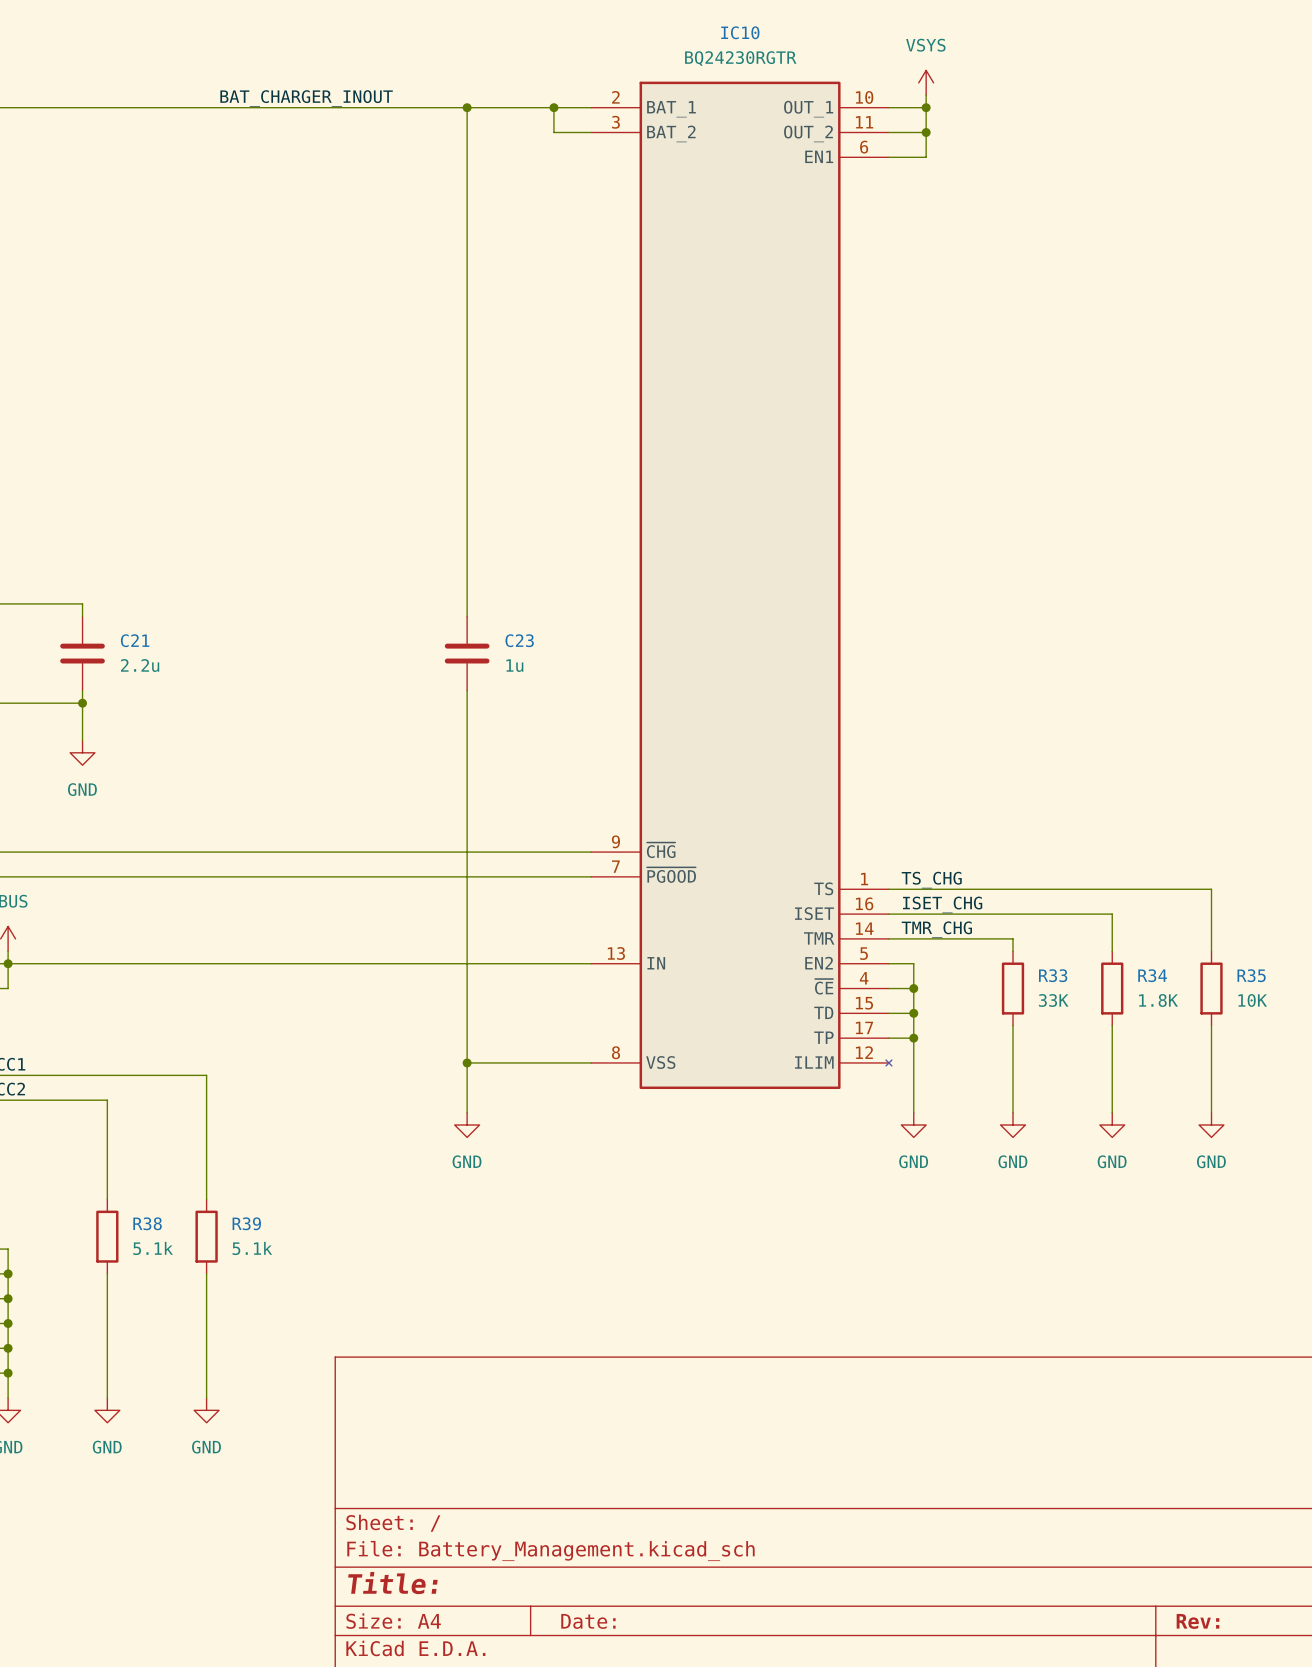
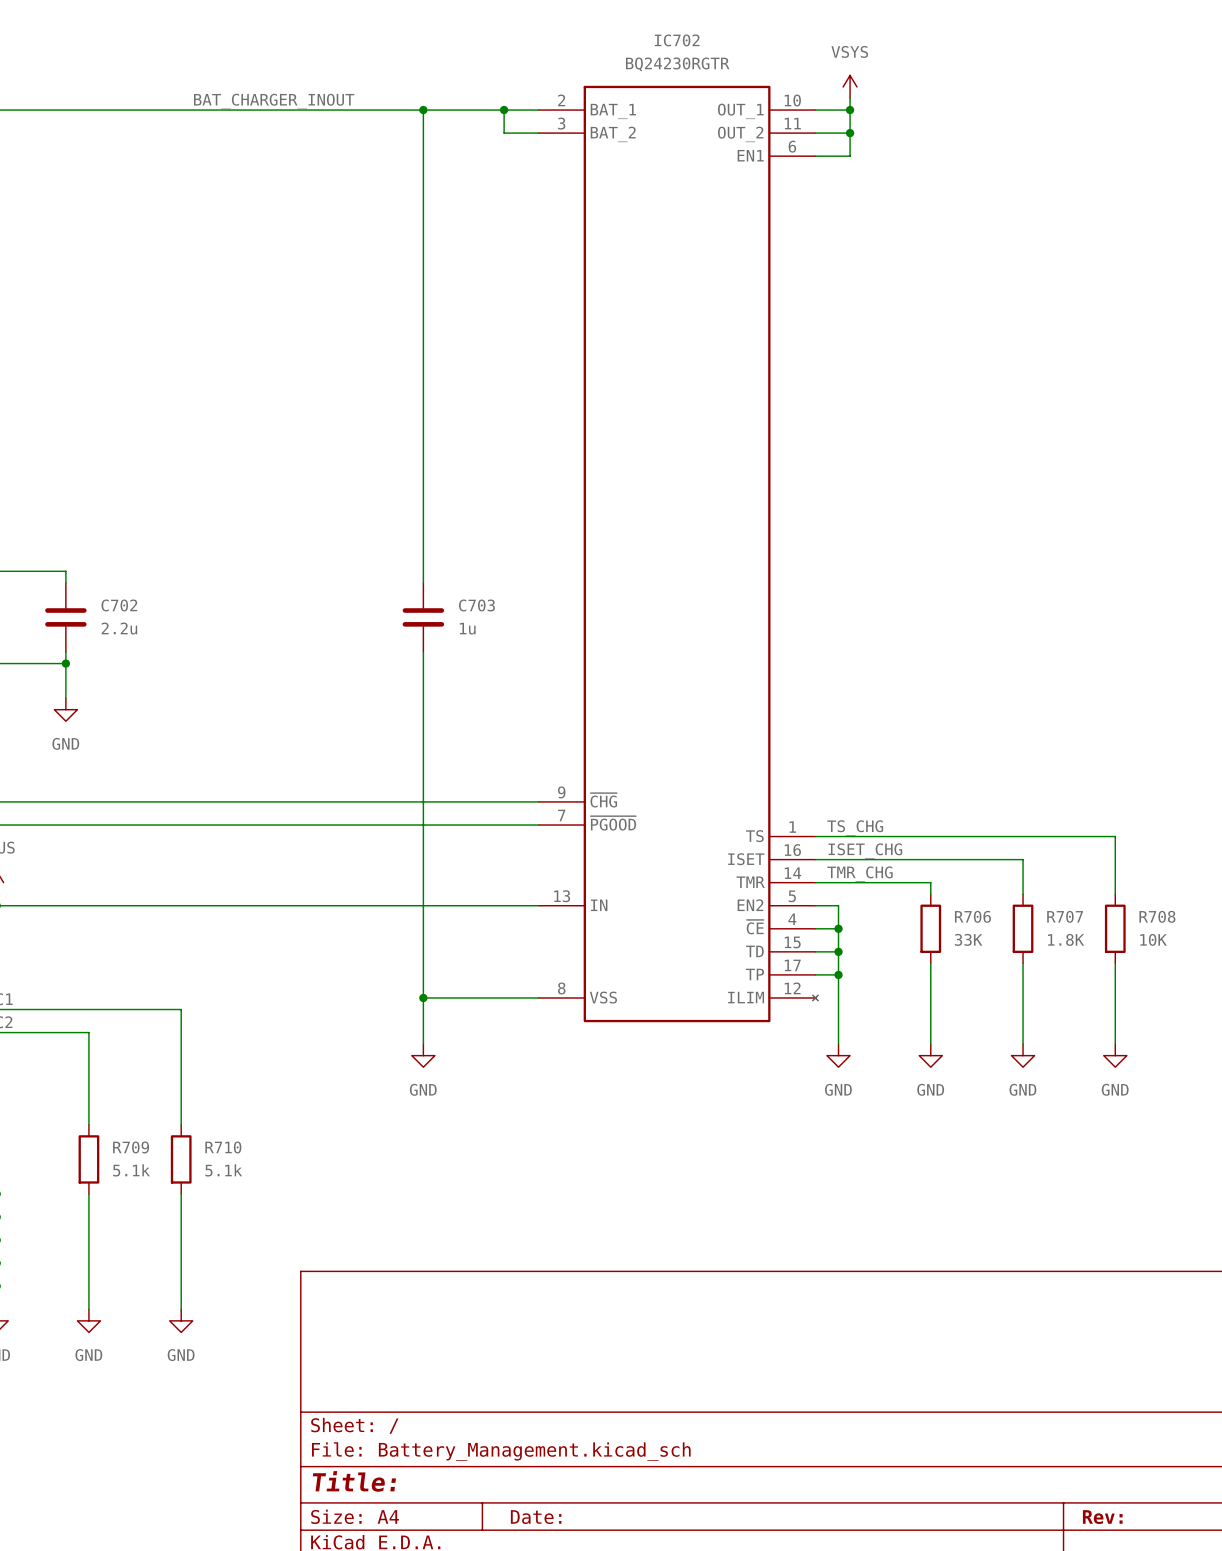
IC10 name: IC10 (740, 32) -> IC702 (677, 40)
C21 name: C21 (135, 640) -> C702 (119, 605)
C23 name: C23 (519, 640) -> C703 (476, 605)
R33 name: R33 (1053, 975) -> R706 (972, 916)
R34 name: R34 (1152, 975) -> R707 (1065, 916)
R35 name: R35 (1251, 975) -> R708 (1157, 916)
R38 name: R38 (147, 1223) -> R709 (131, 1147)
R39 name: R39 (246, 1223) -> R710 (223, 1147)

